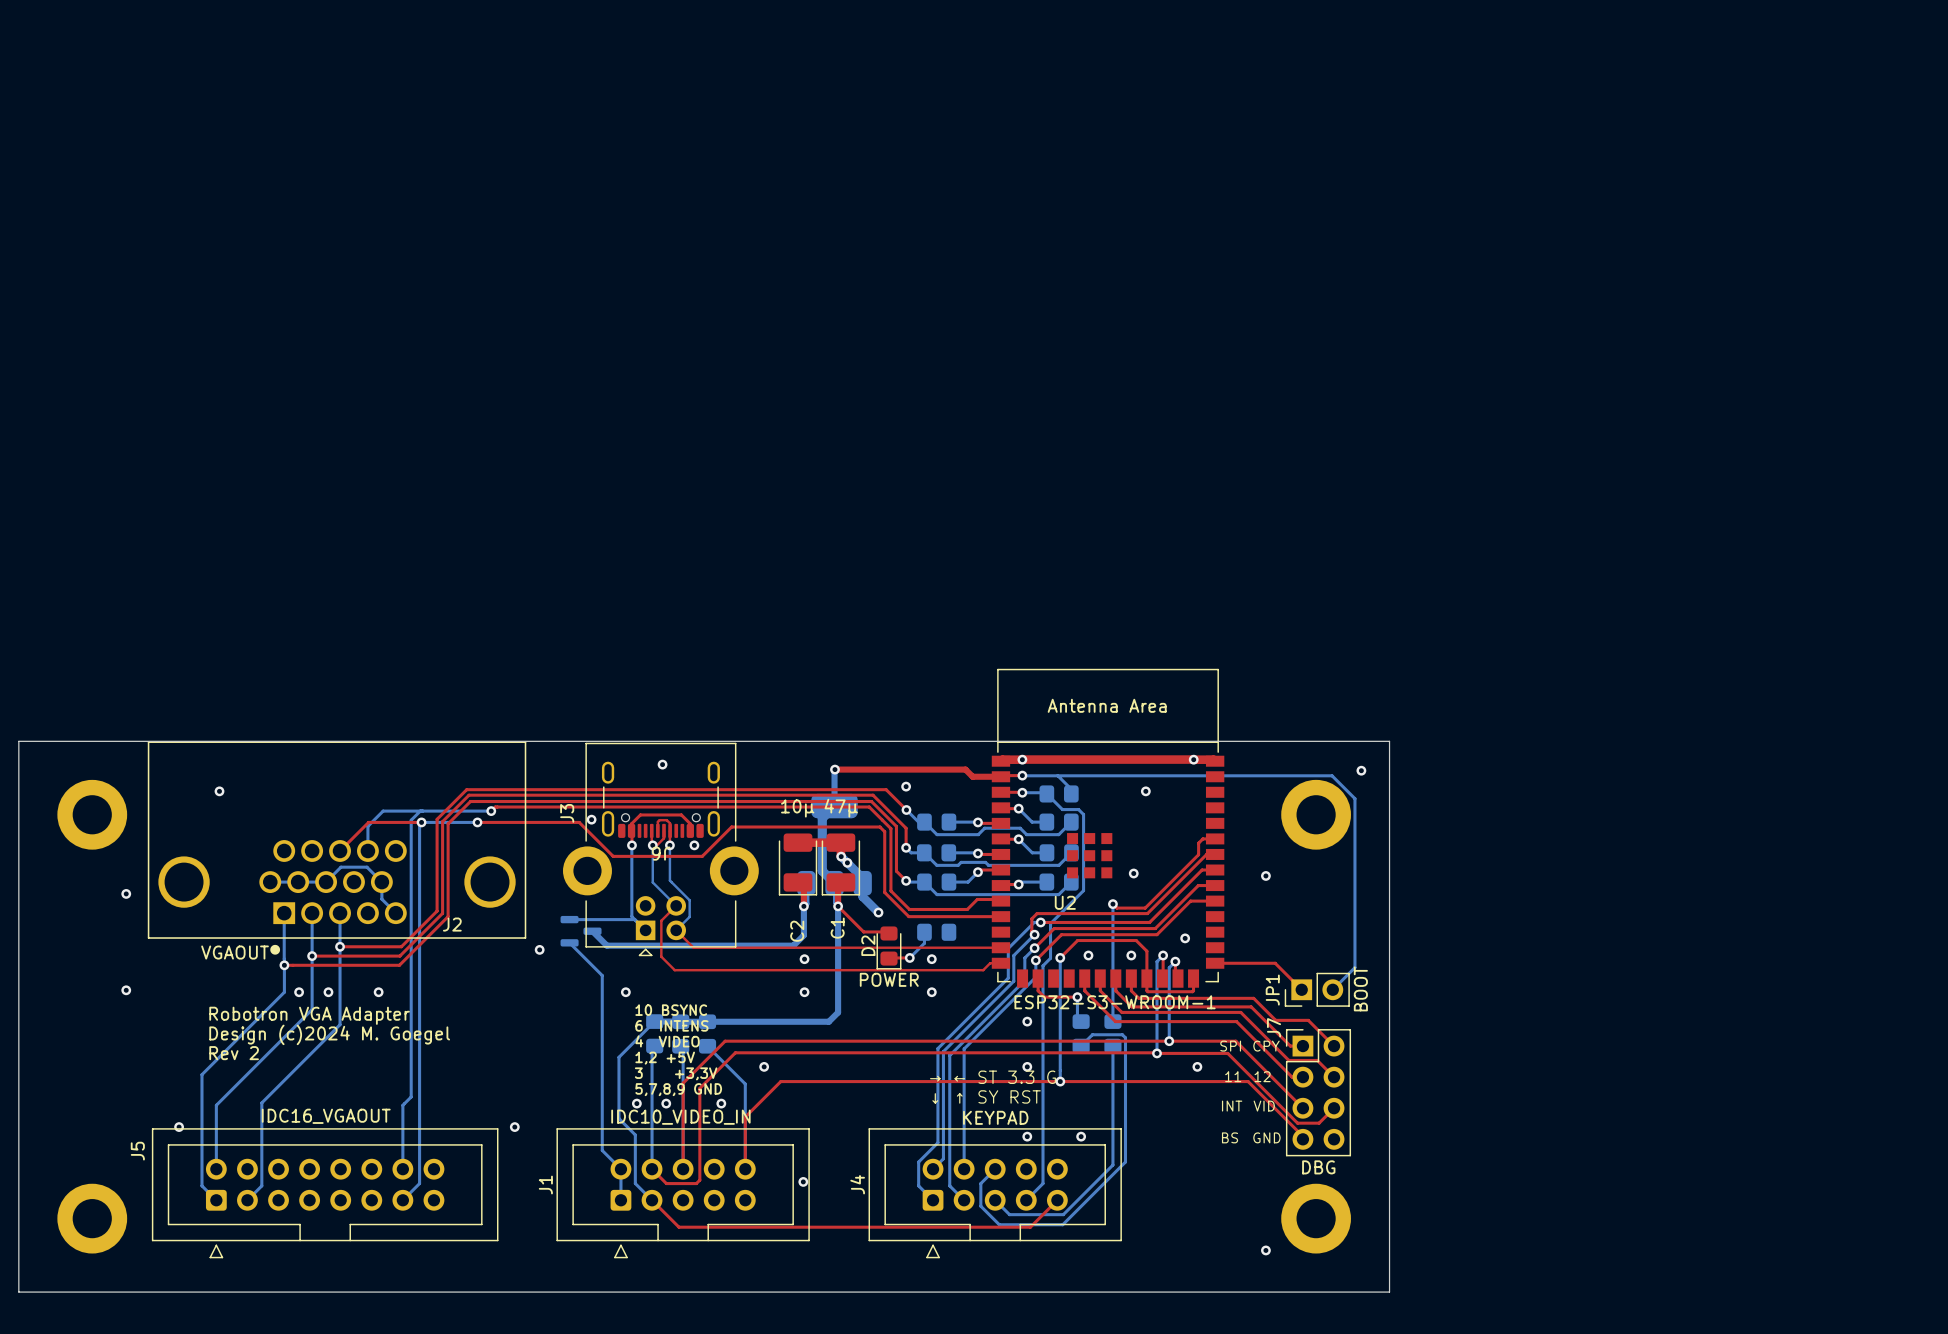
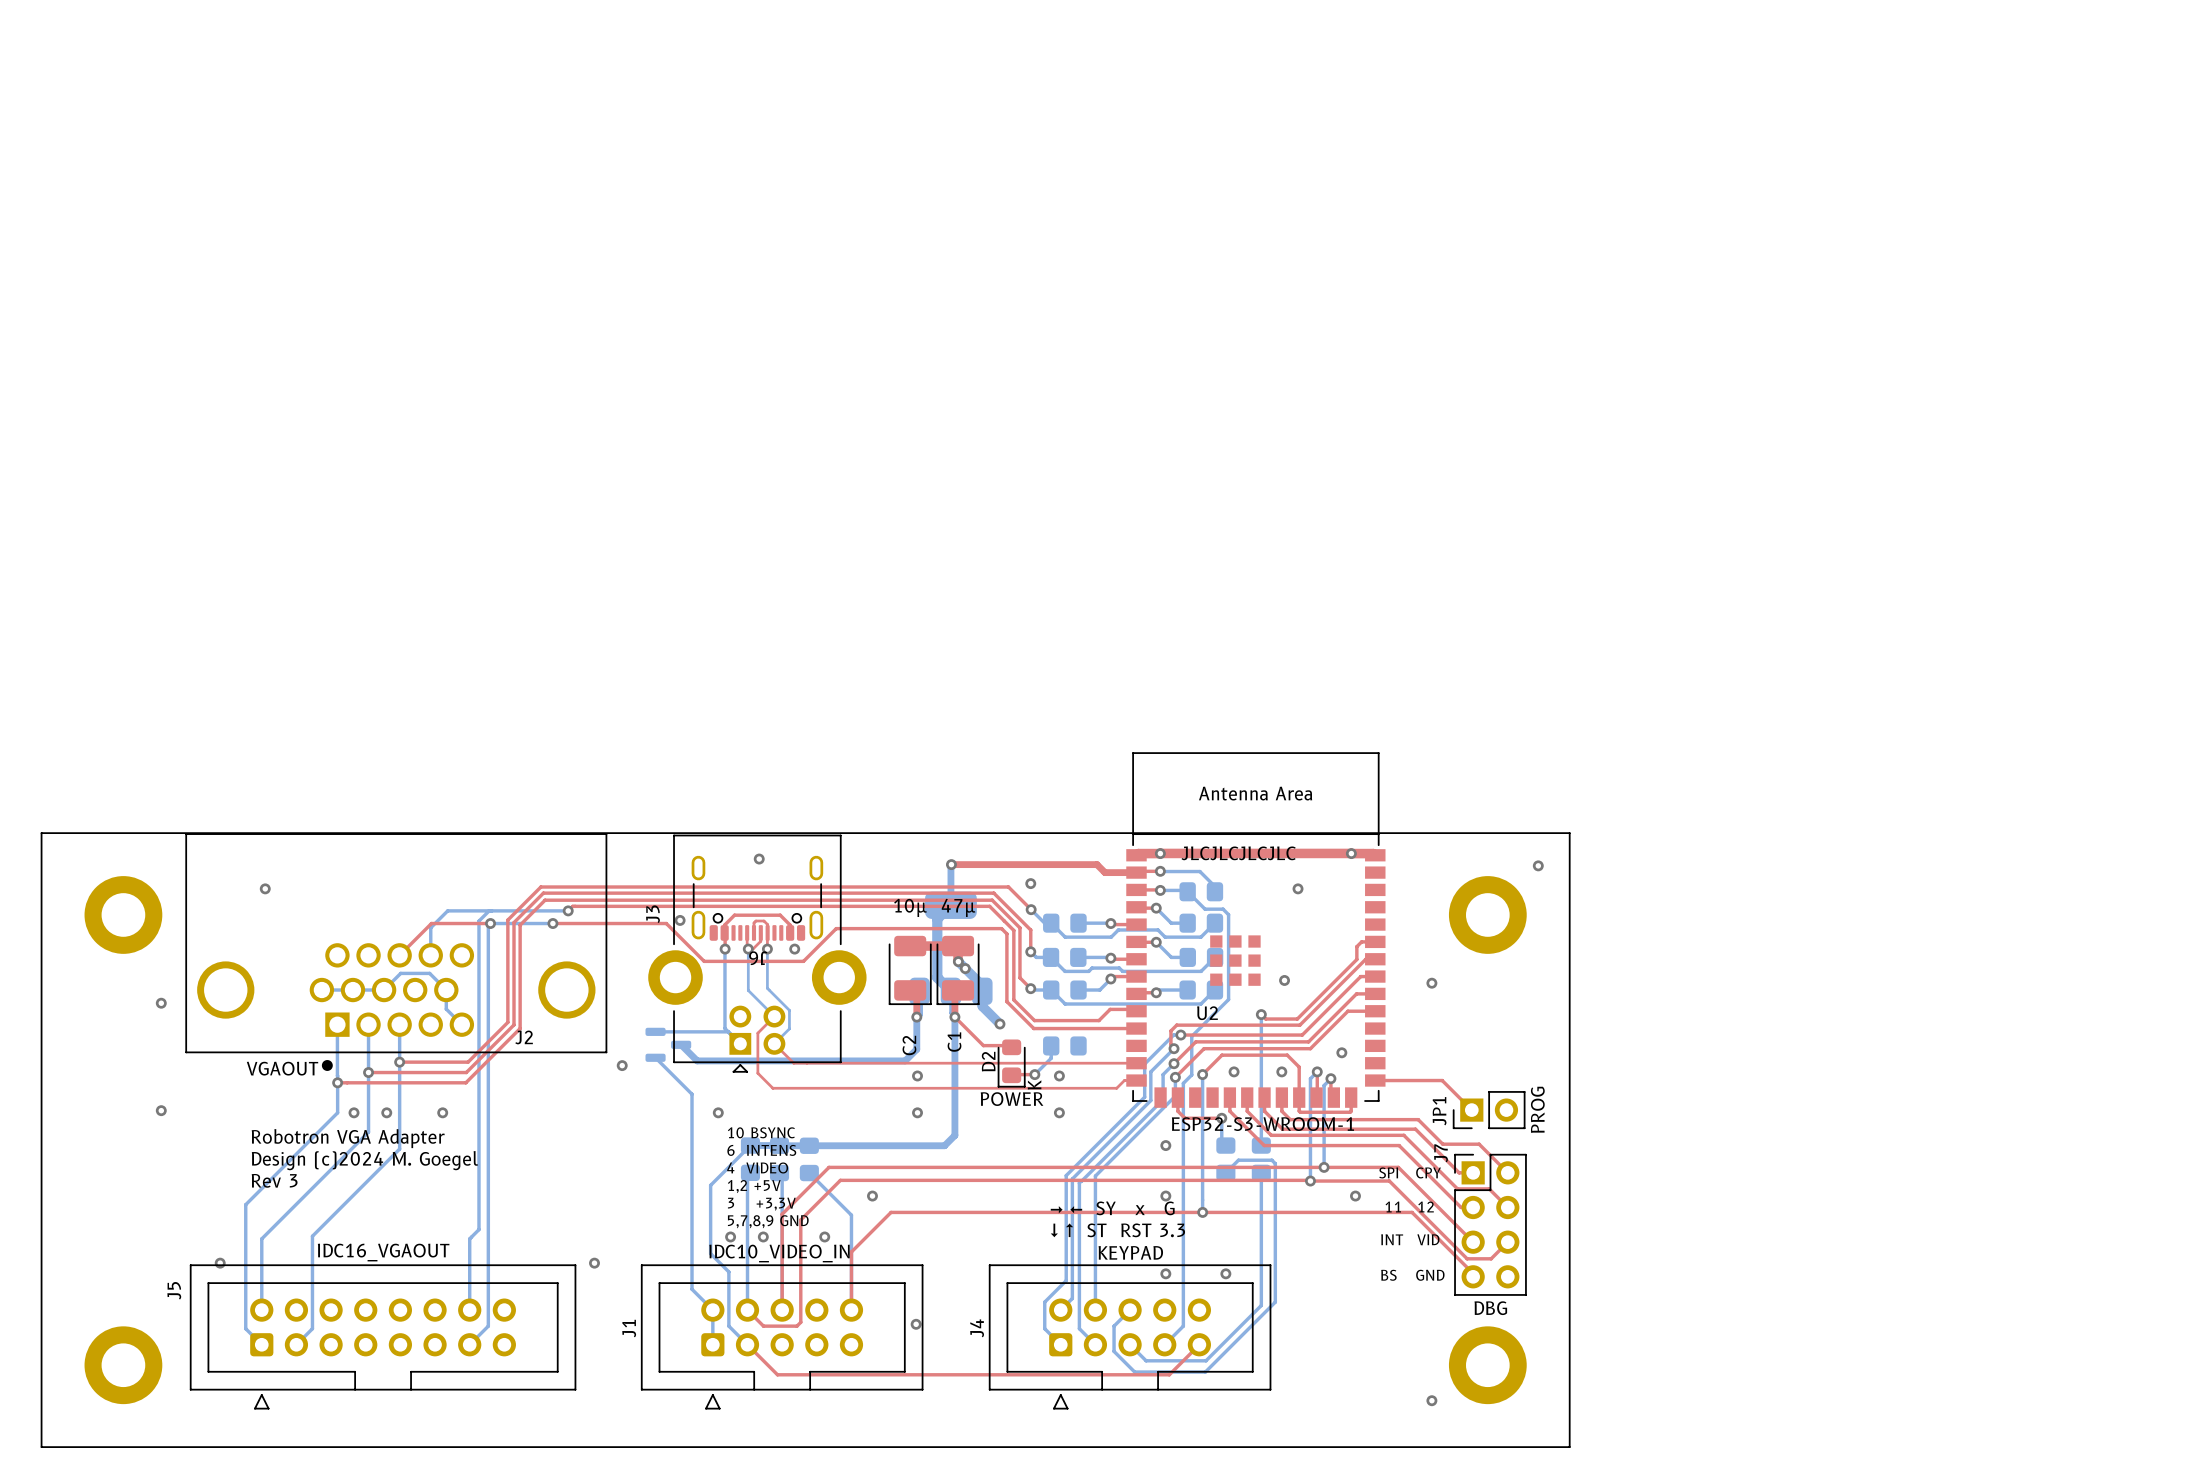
text: none -> JLCJLCJLCJLC (1238, 853)
bottom track: (1057, 775) (1332, 775) (1354, 798) (1354, 967) (1332, 989) -> none
text: none -> K (1034, 1084)
JP1 value: BOOT (1360, 988) -> PROG (1537, 1109)
text: Rev 2 (234, 1053) -> Rev 3 (274, 1180)
text: → ← ST 3.3 G (993, 1077) -> → ← SY x G (1112, 1208)
text: ↓ ↑ SY RST (986, 1096) -> ↓ ↑ ST RST 3.3 (1117, 1230)

